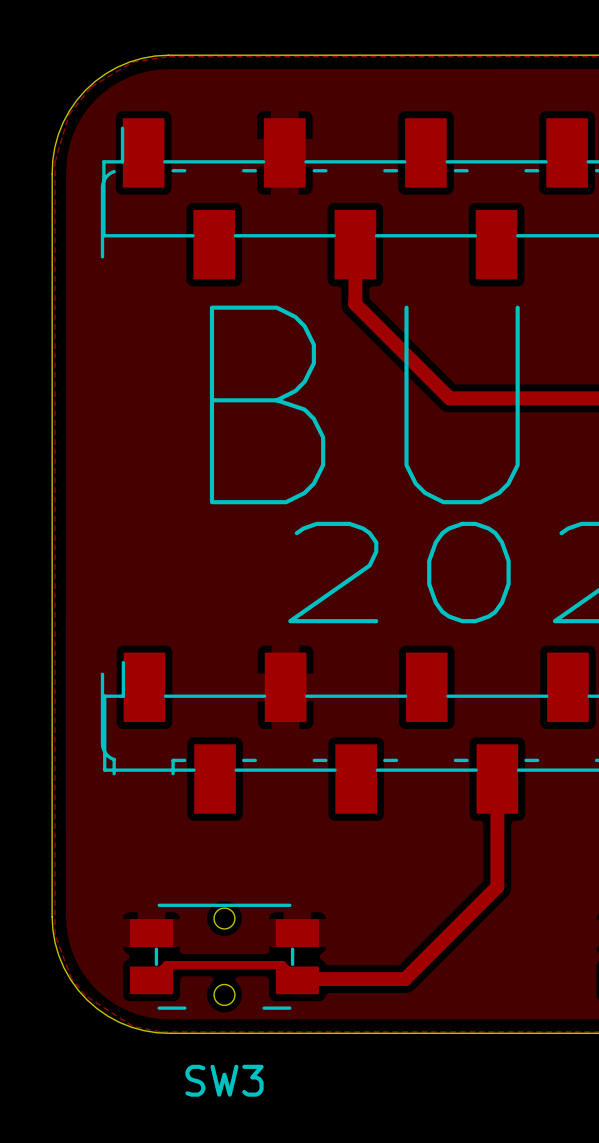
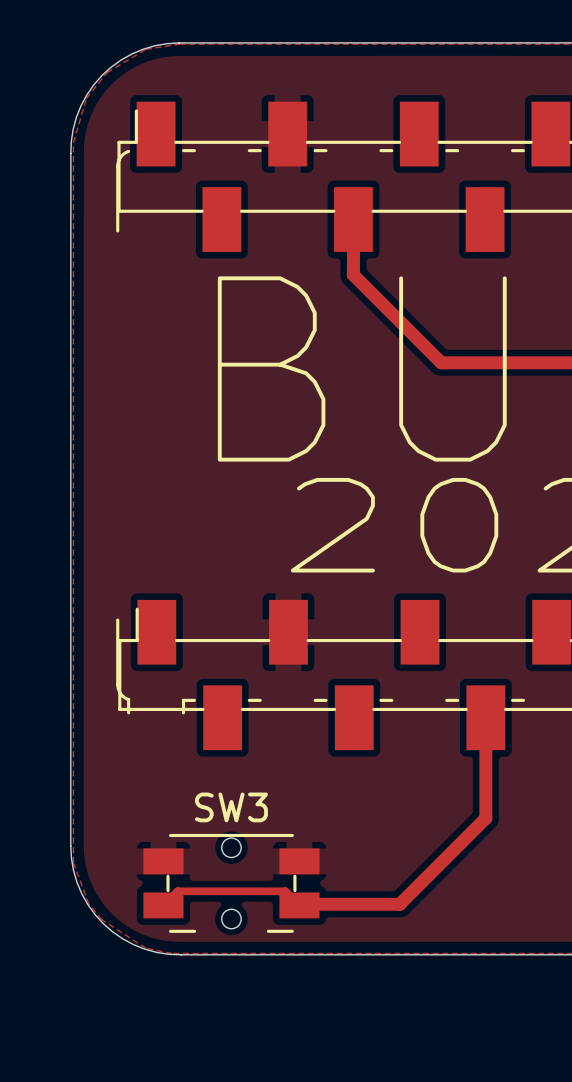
SW3 name position: SW3 (224, 1080) -> SW3 (231, 807)

